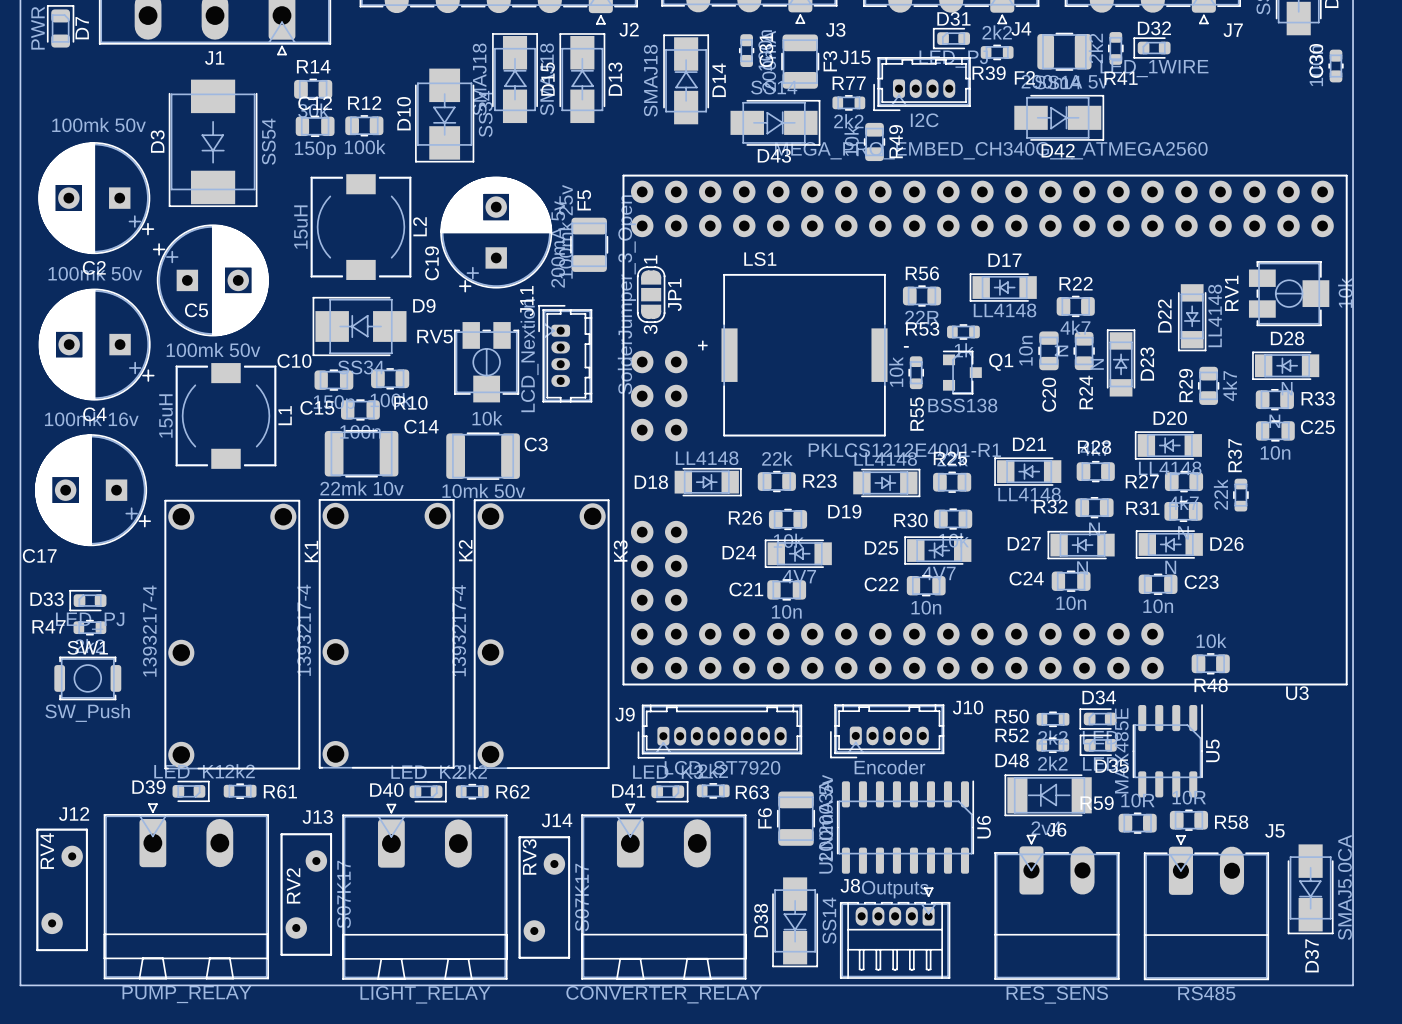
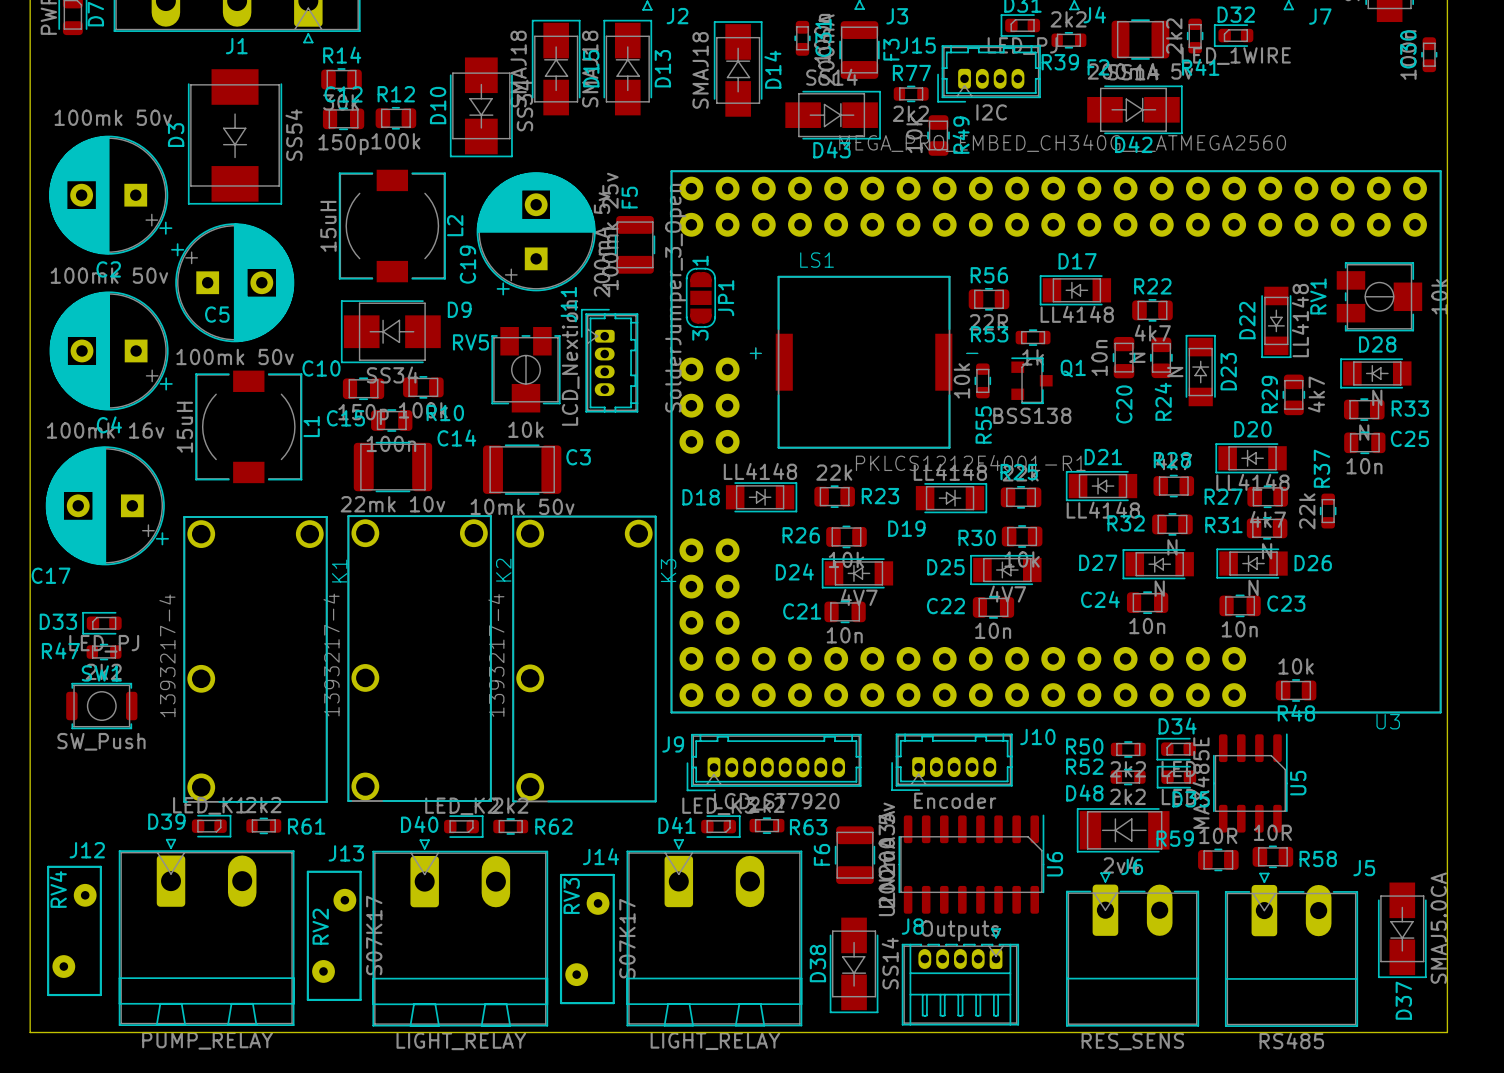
J14 value: CONVERTER_RELAY (664, 994) -> LIGHT_RELAY (715, 1041)

